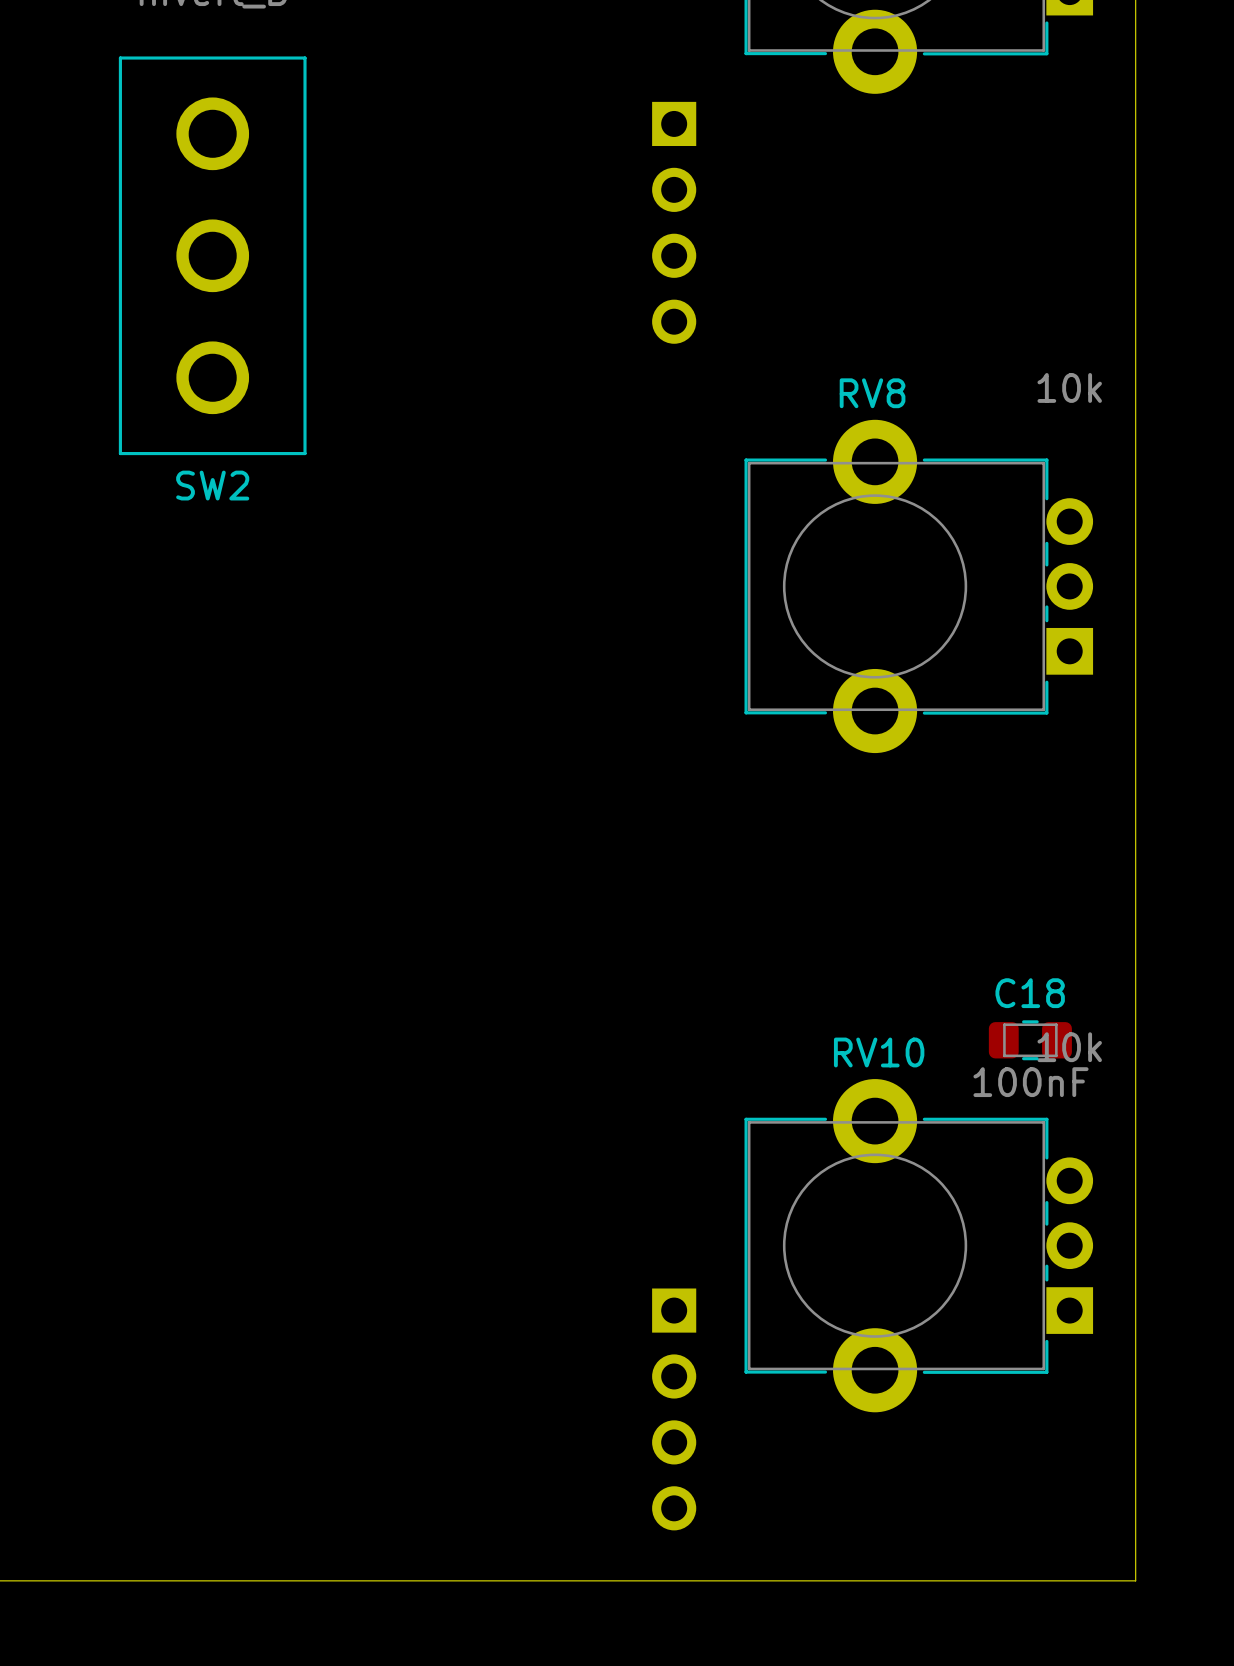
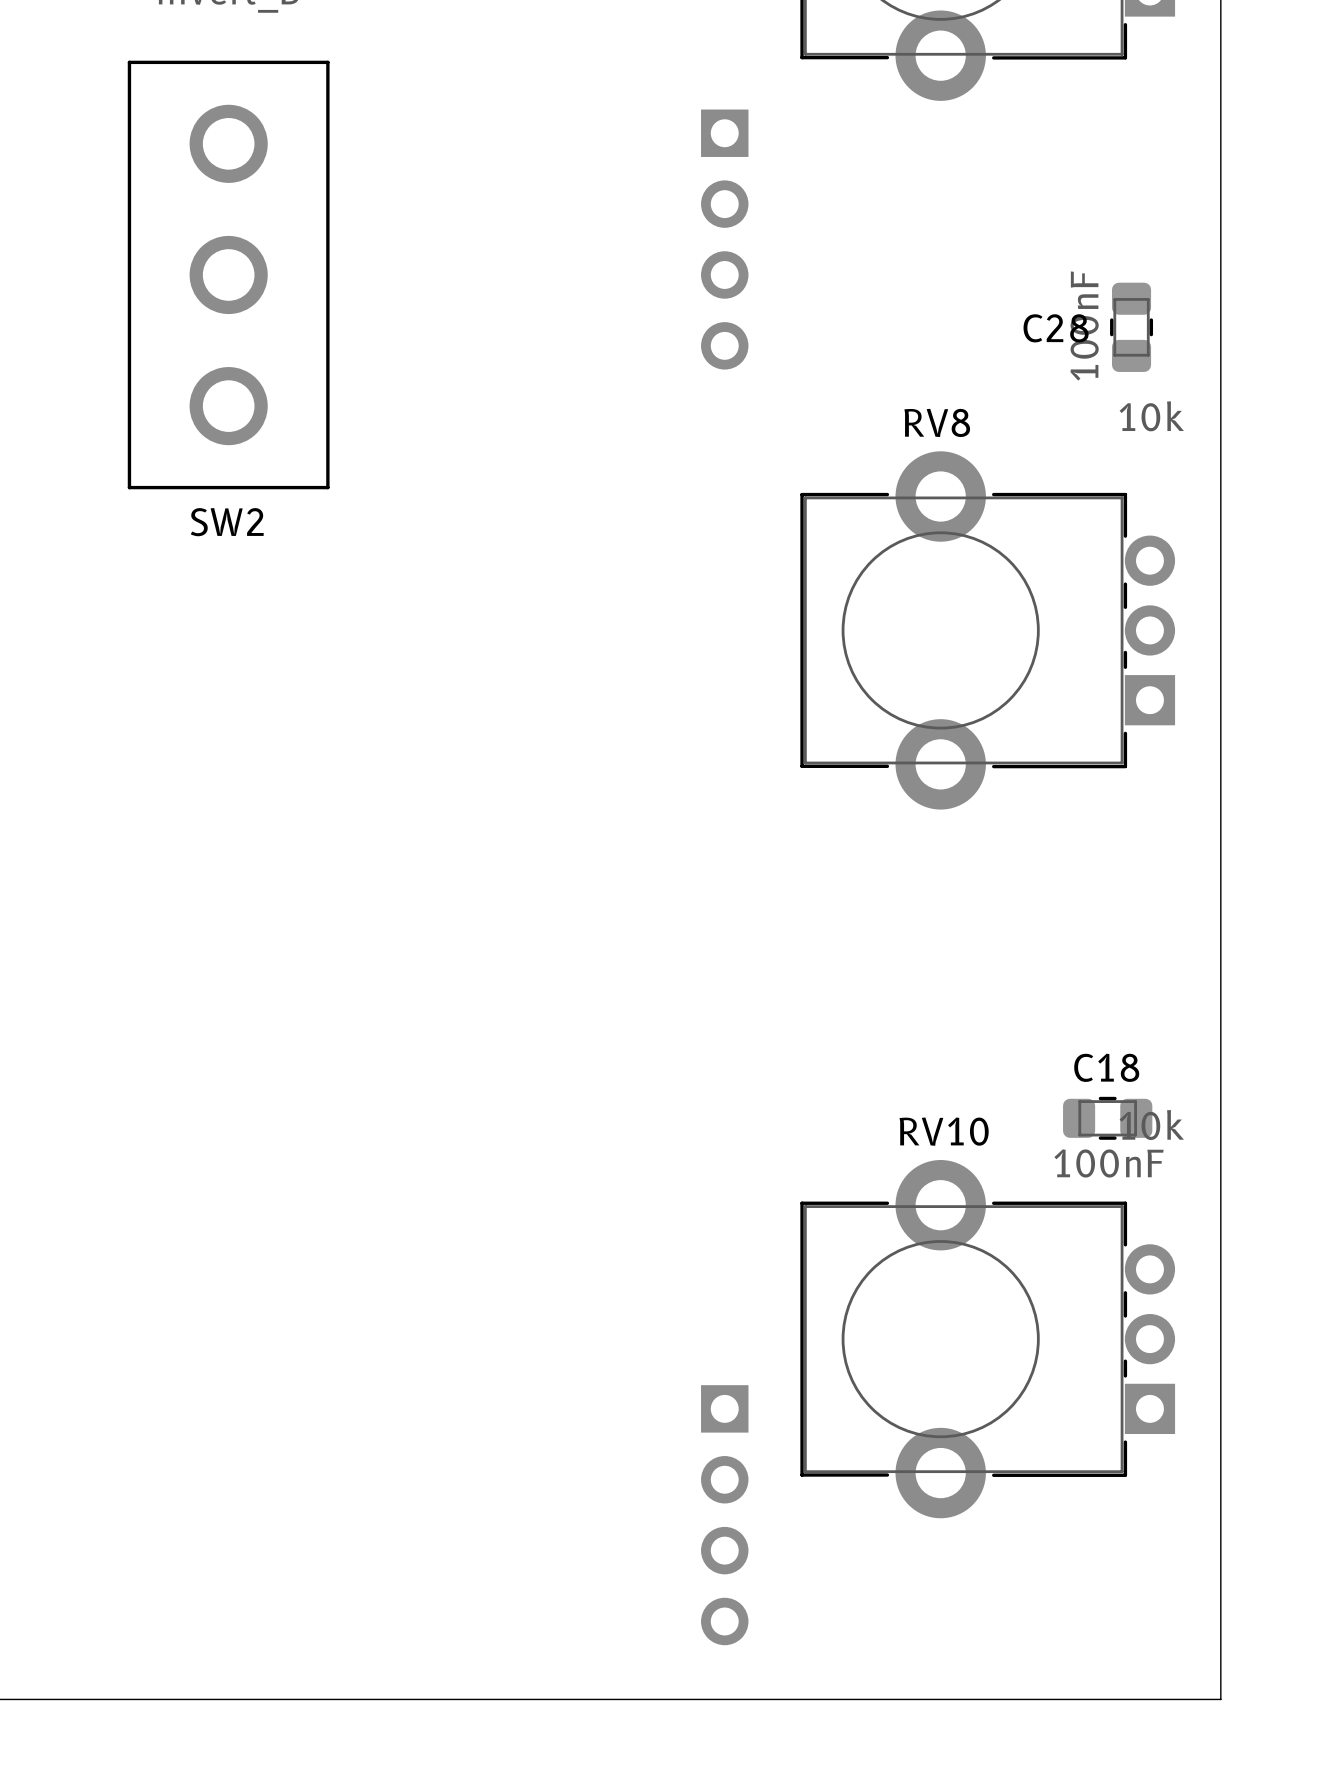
C28: none -> 100nF (1131, 327)

